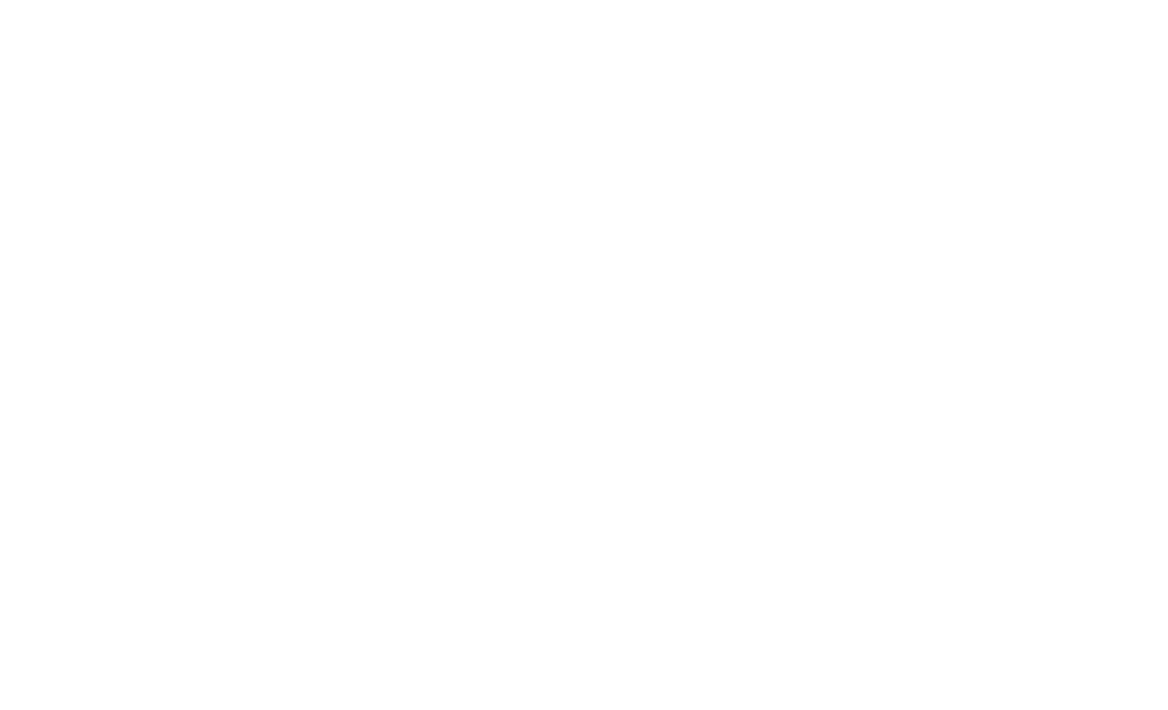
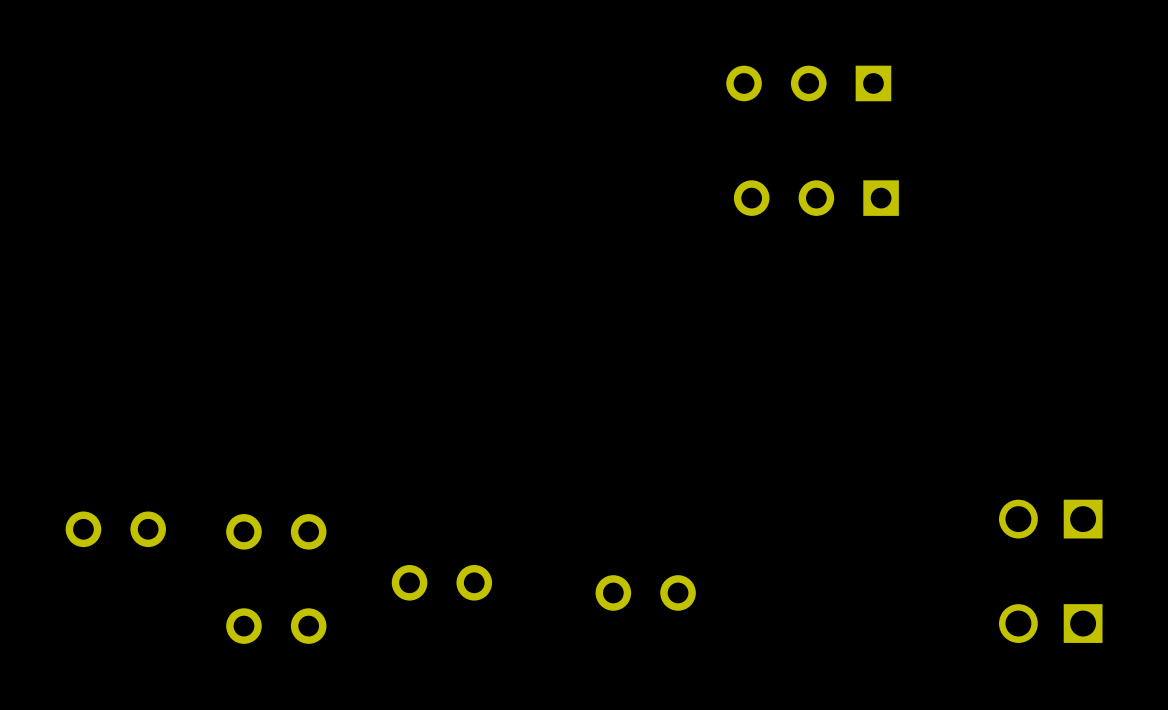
part: none -> (808, 83)
part: none -> (816, 198)
part: none -> (1050, 519)
part: none -> (115, 529)
part: none -> (276, 531)
part: none -> (441, 582)
part: none -> (645, 592)
part: none -> (1050, 623)
part: none -> (276, 626)

